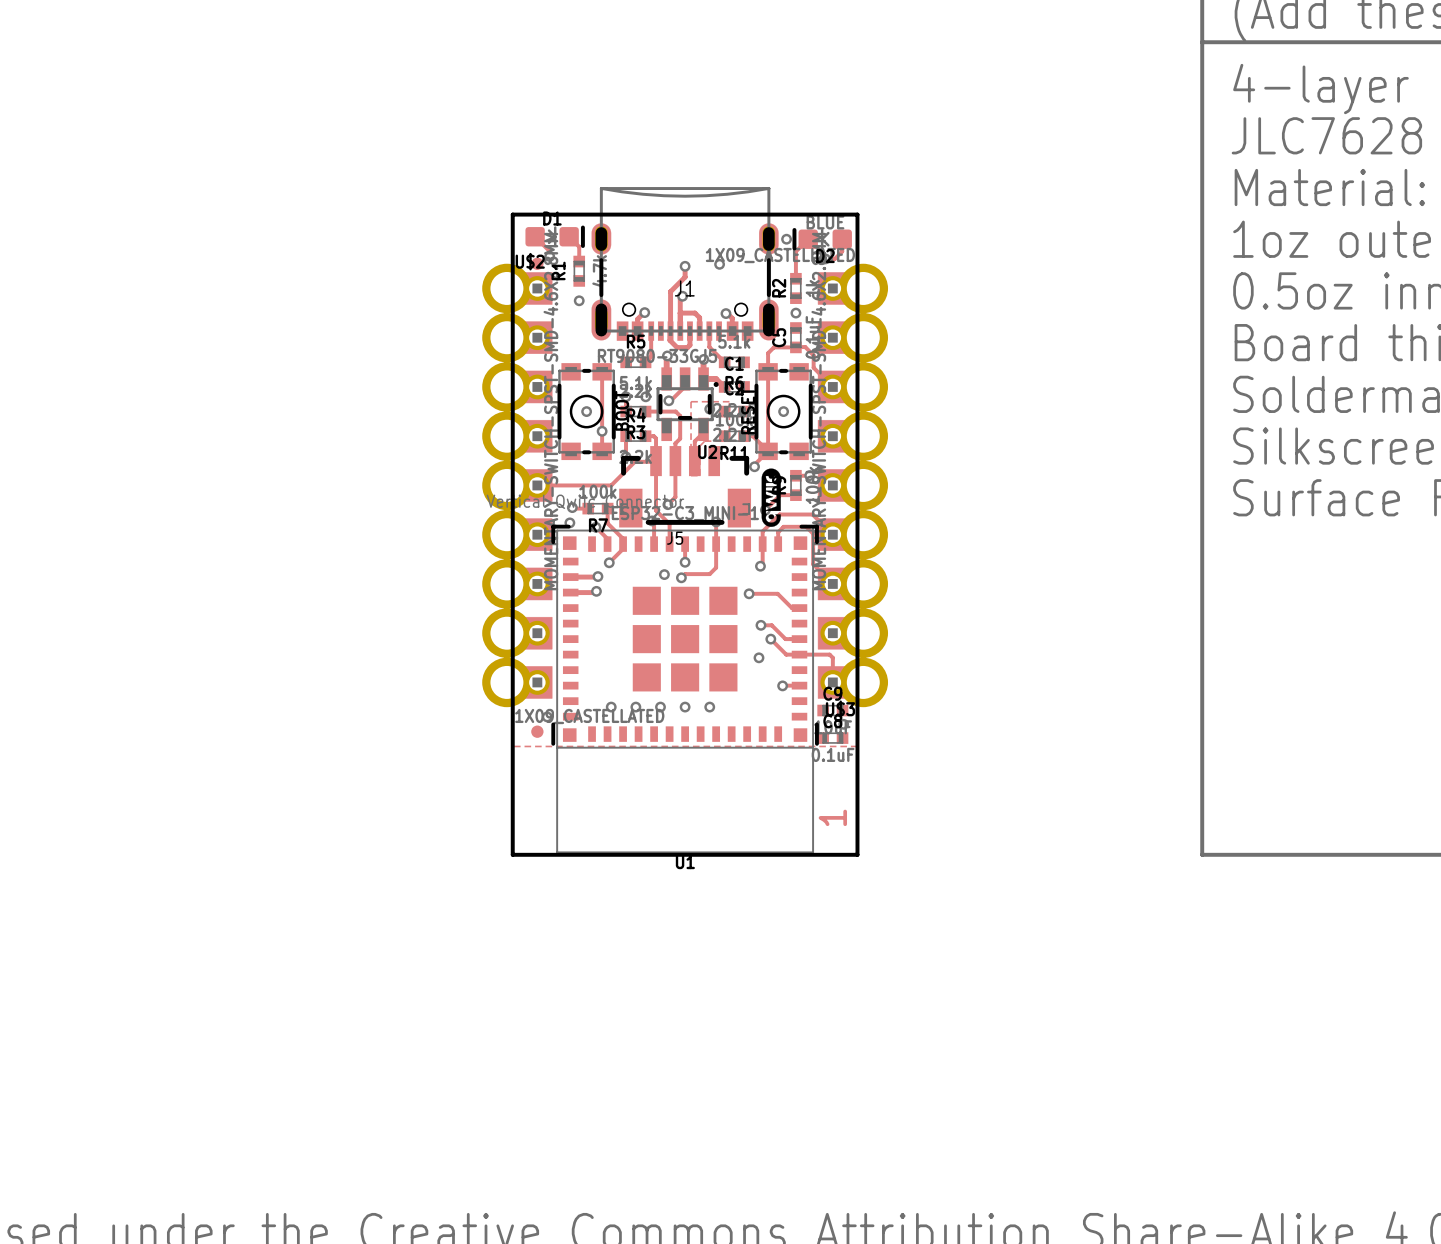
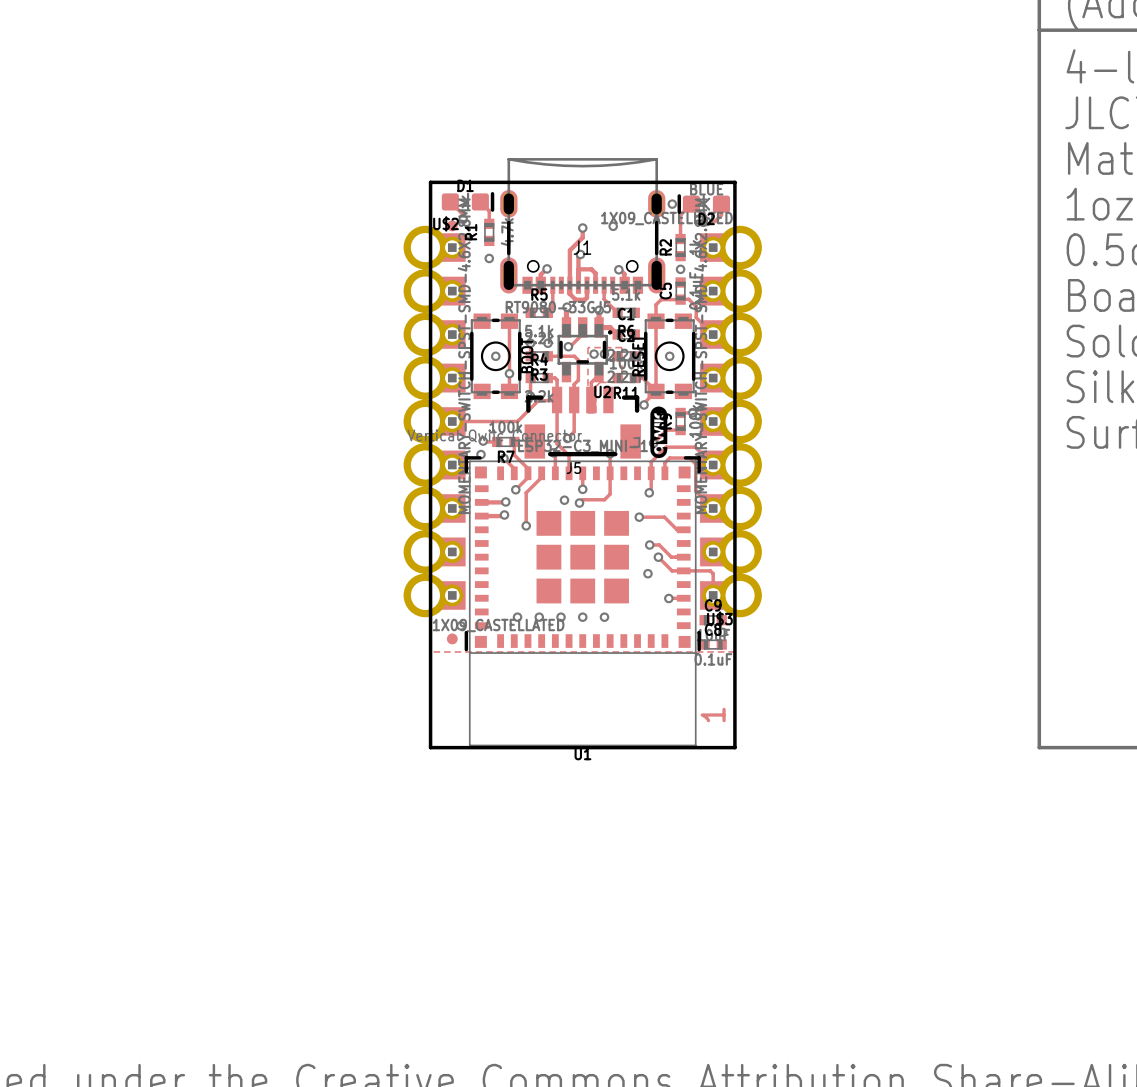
via: none -> (594, 354)
track: none -> (541, 473) (541, 477) (526, 492) (526, 525)
via: none -> (526, 525)

